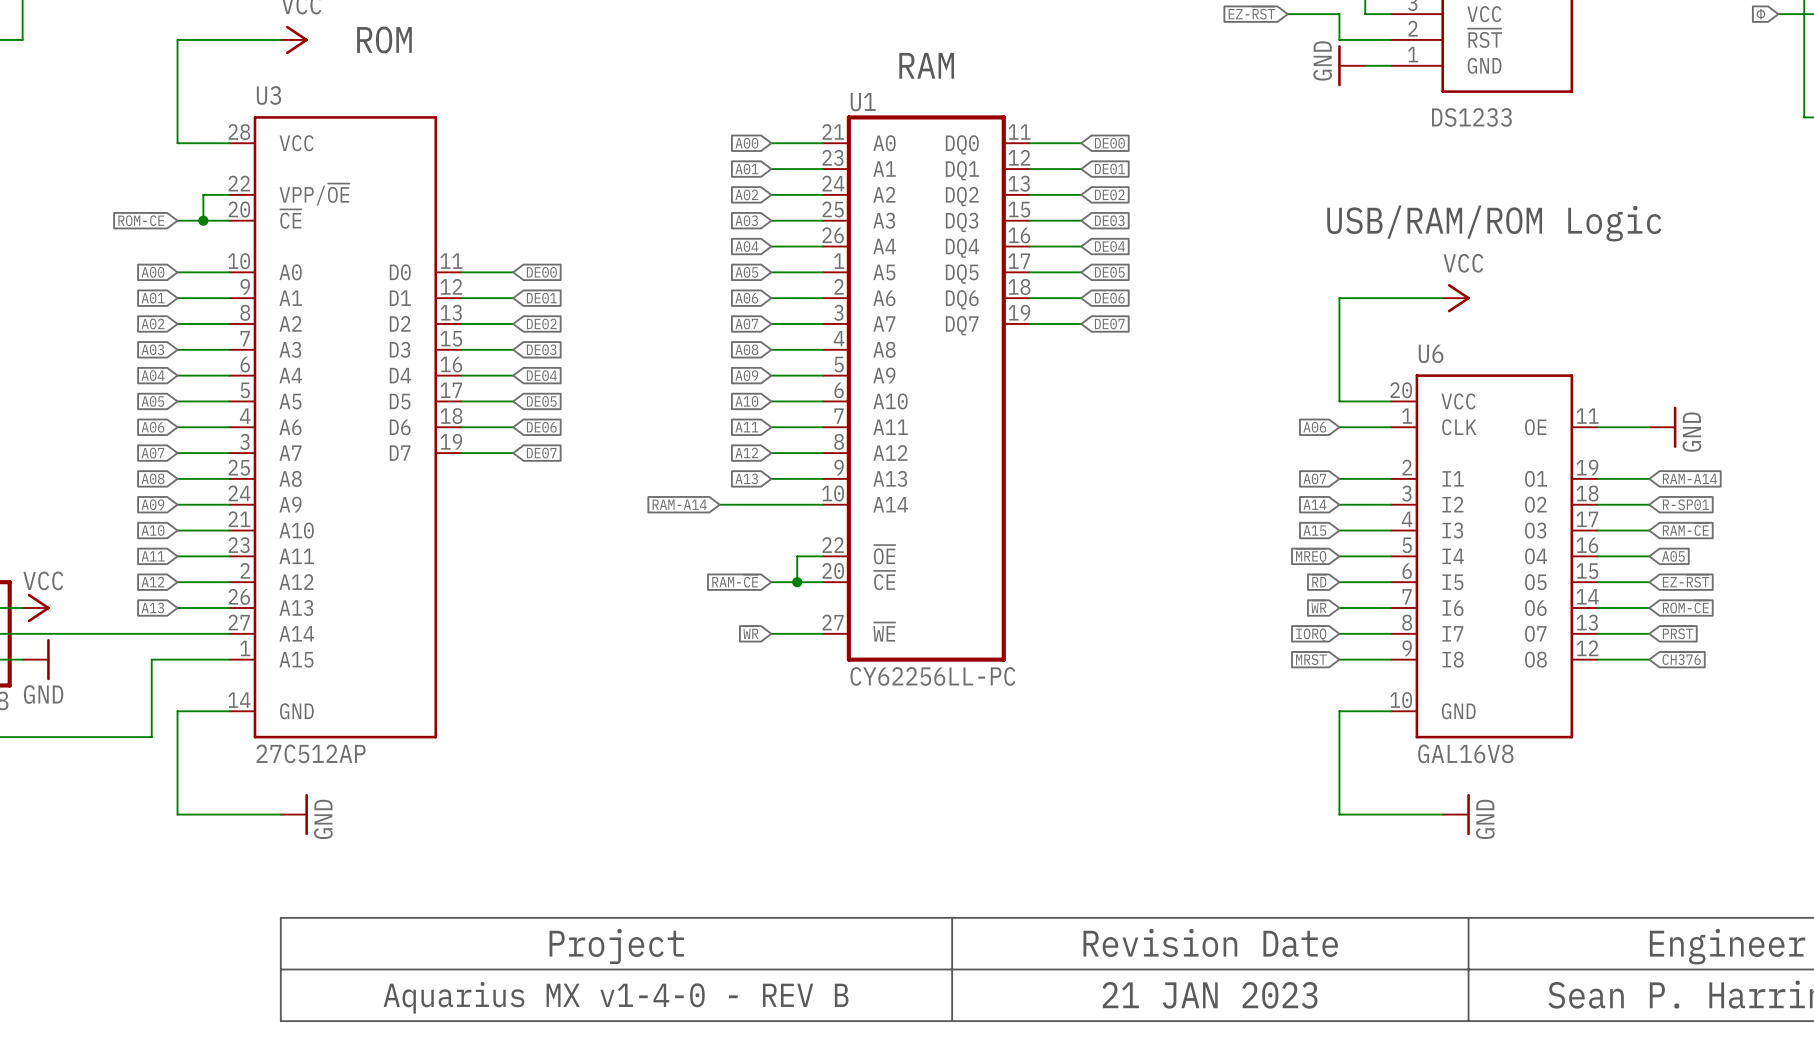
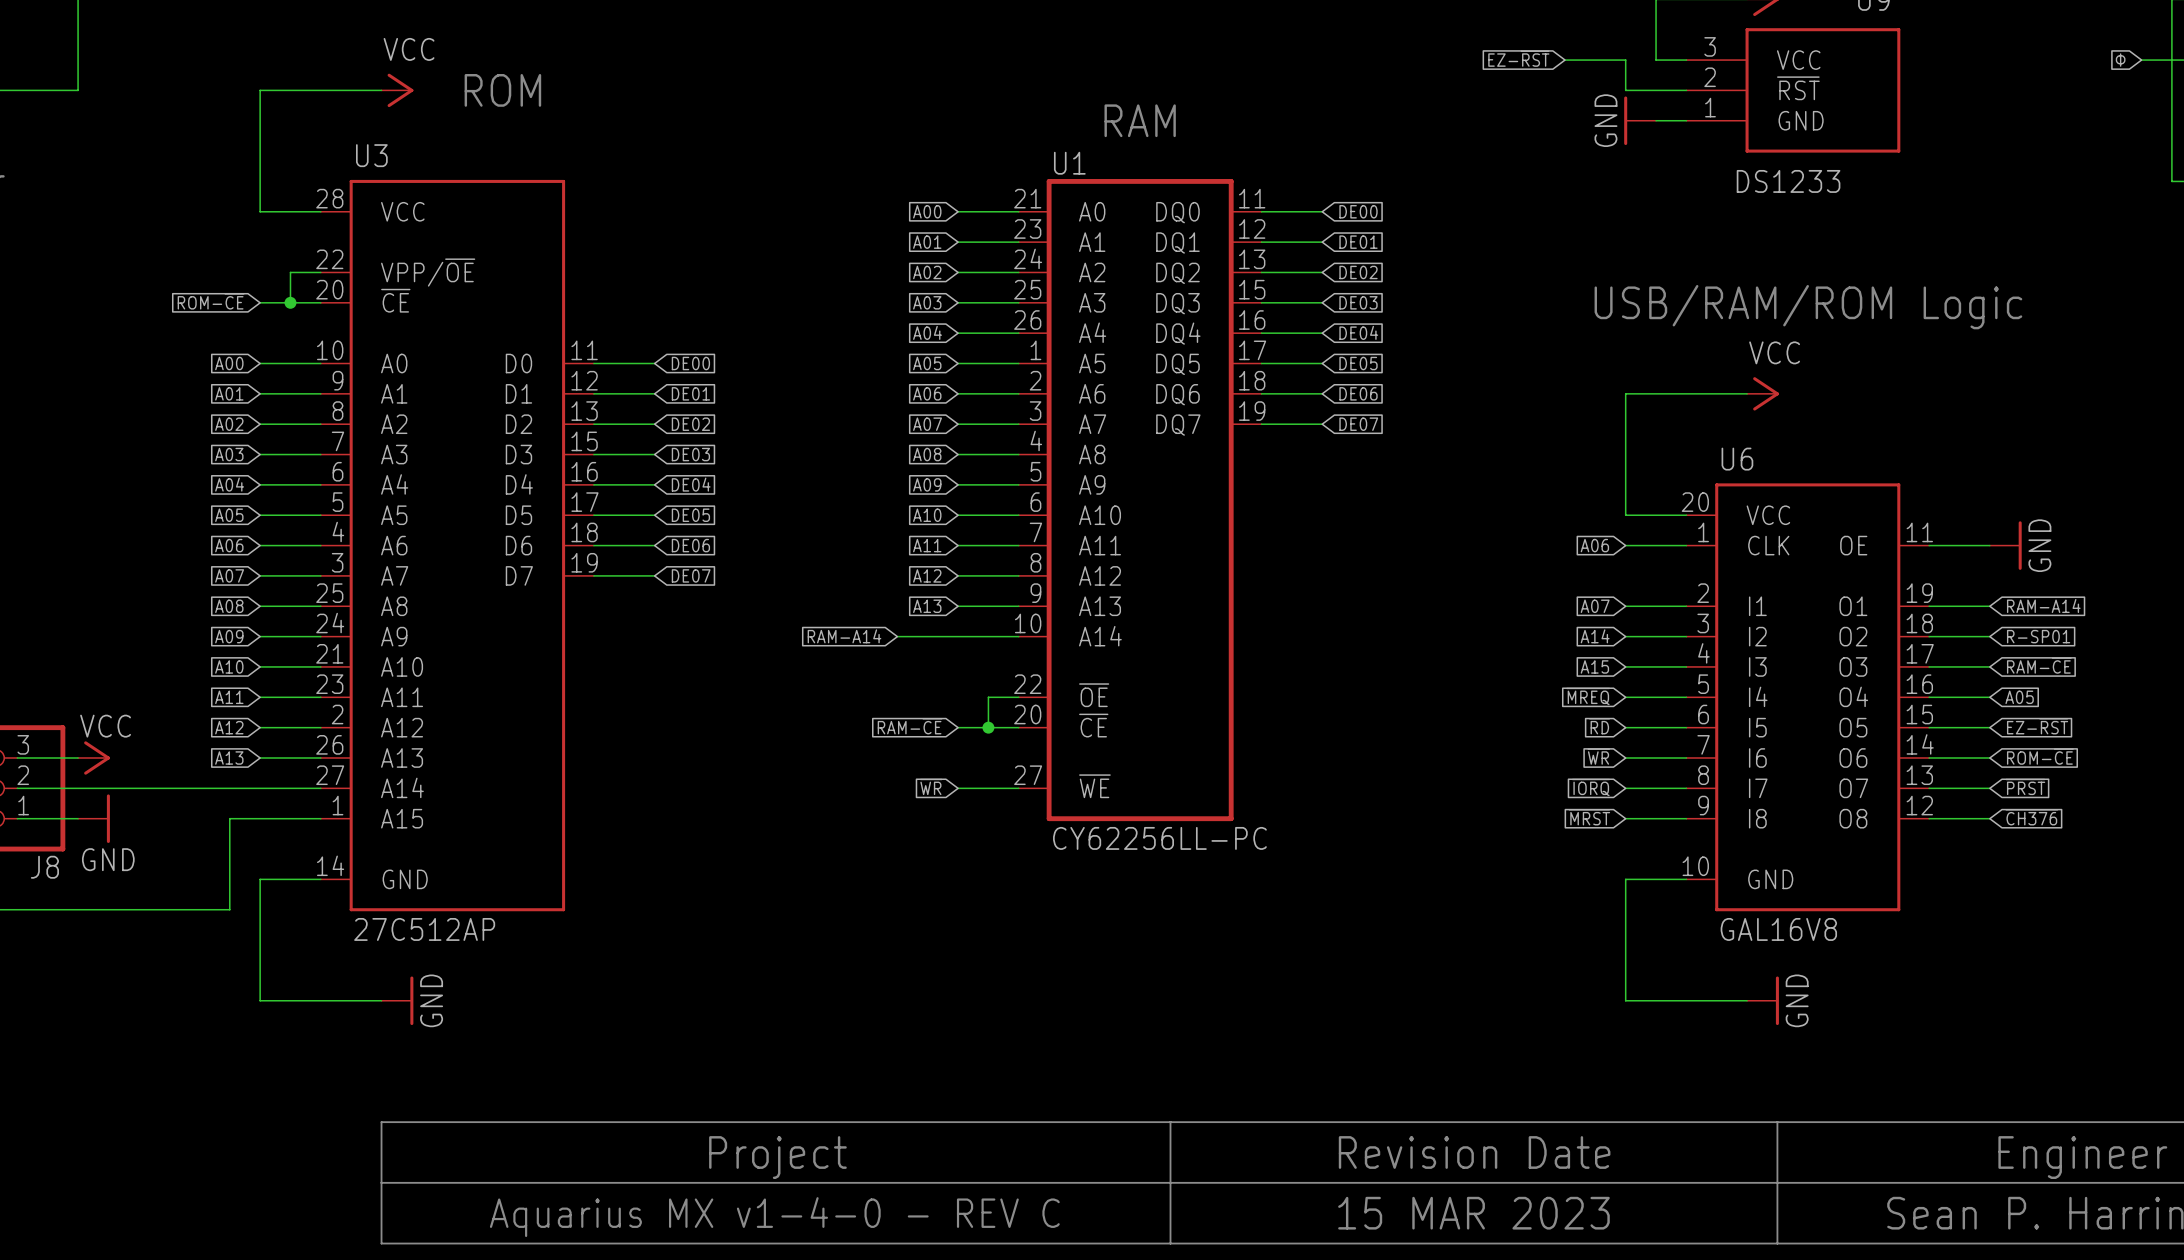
text: 21 JAN 2023 (1210, 995) -> 15 MAR 2023 (1473, 1213)
text: Aquarius MX v1-4-0 - REV B (616, 997) -> Aquarius MX v1-4-0 - REV C (774, 1217)

